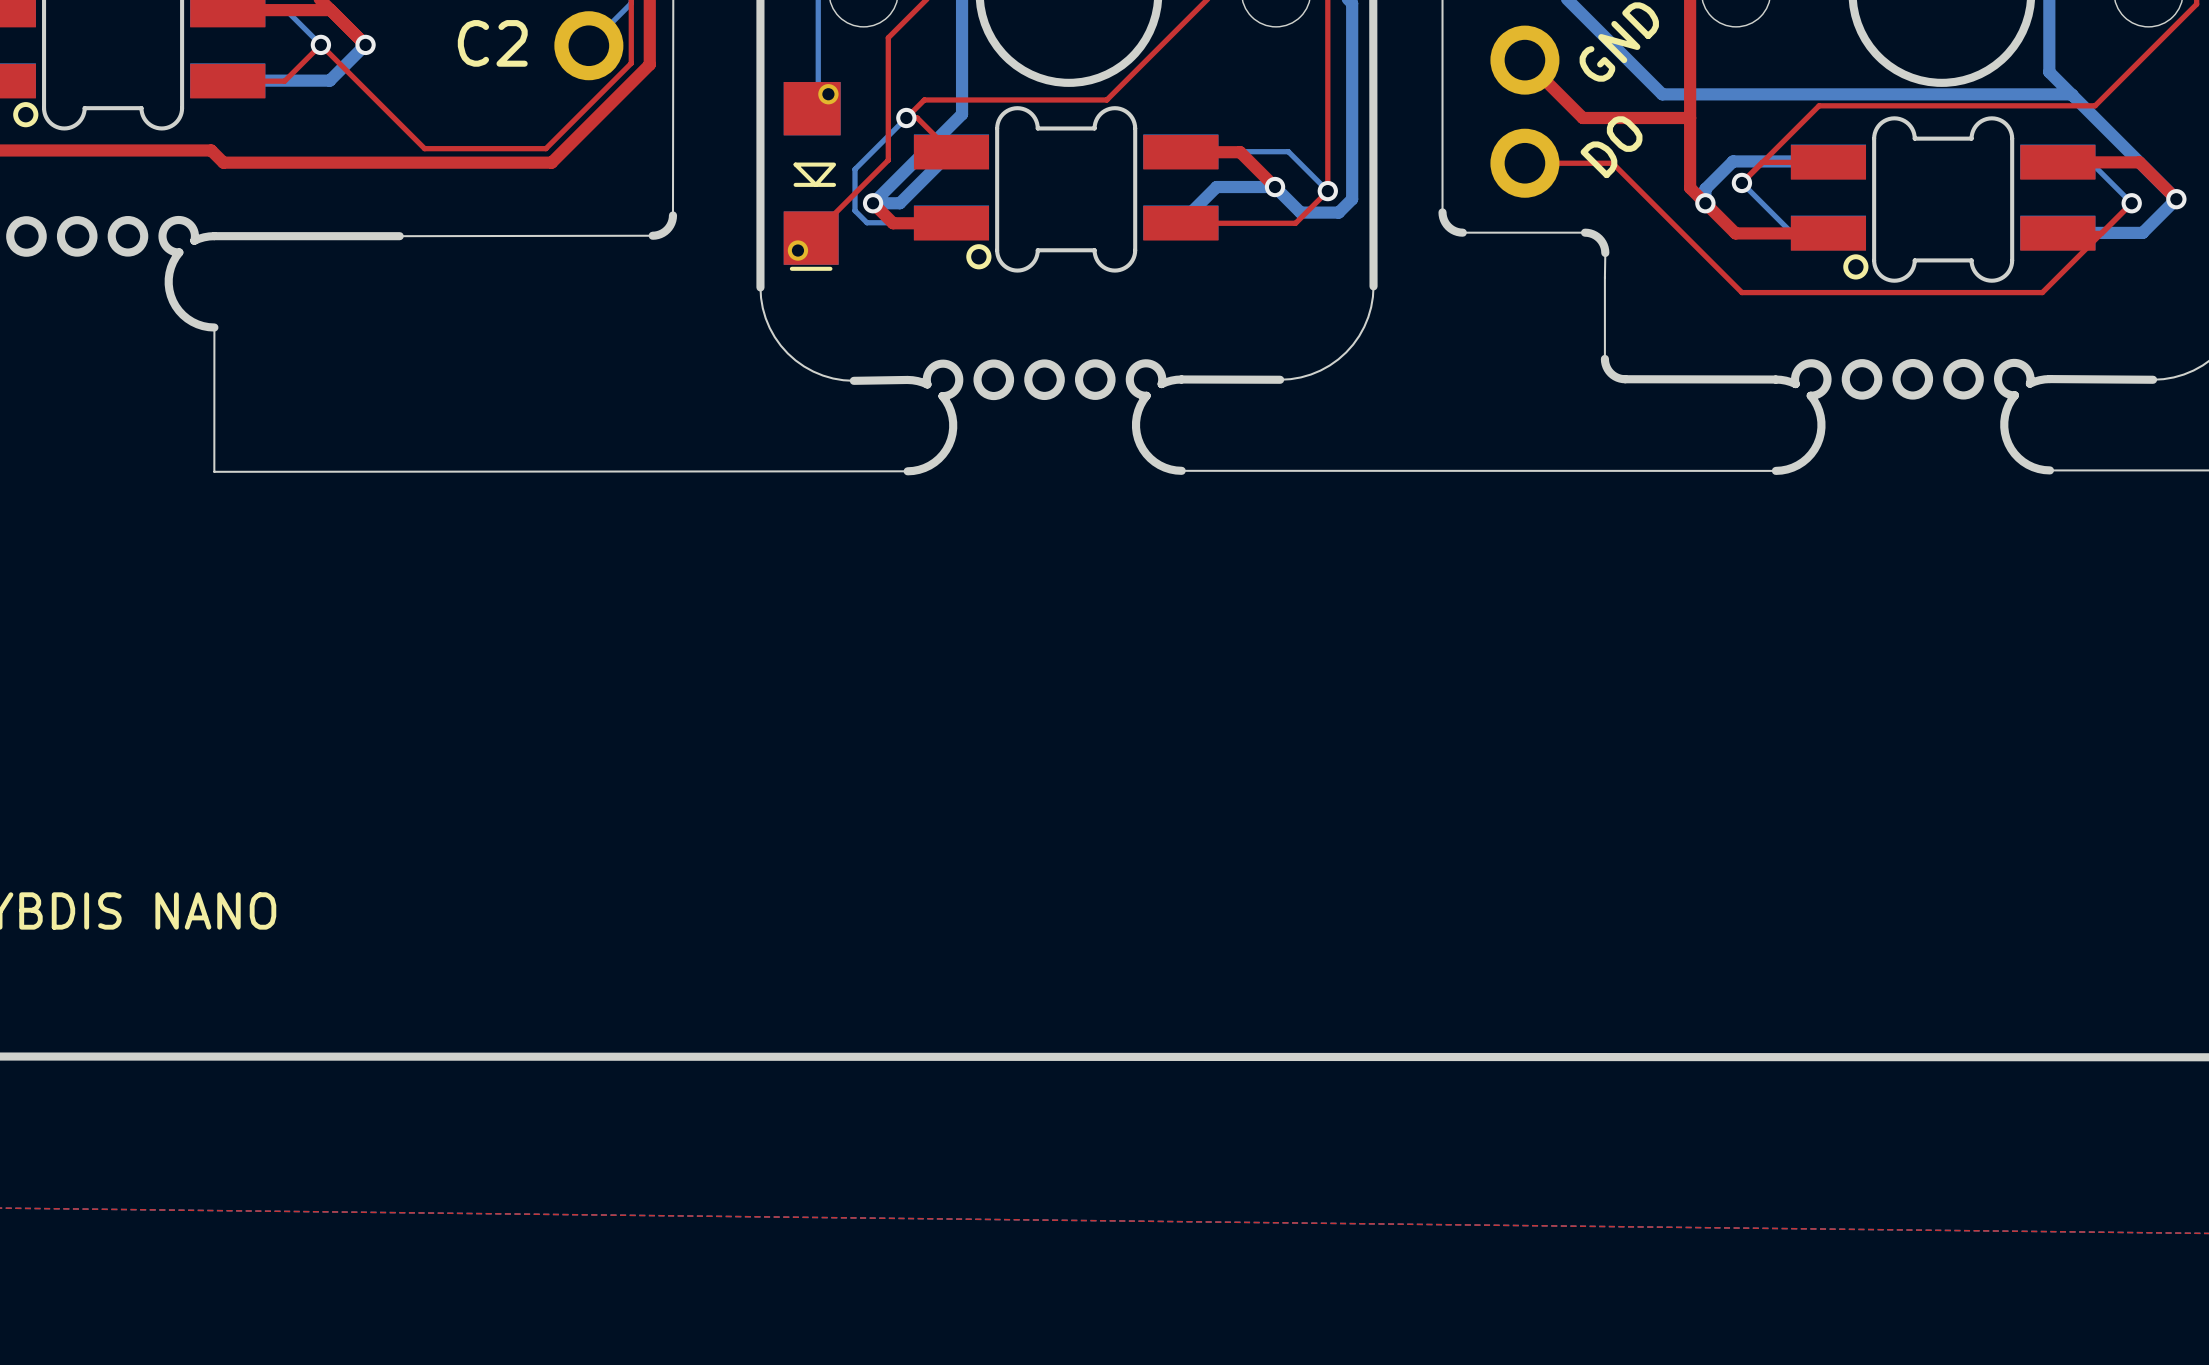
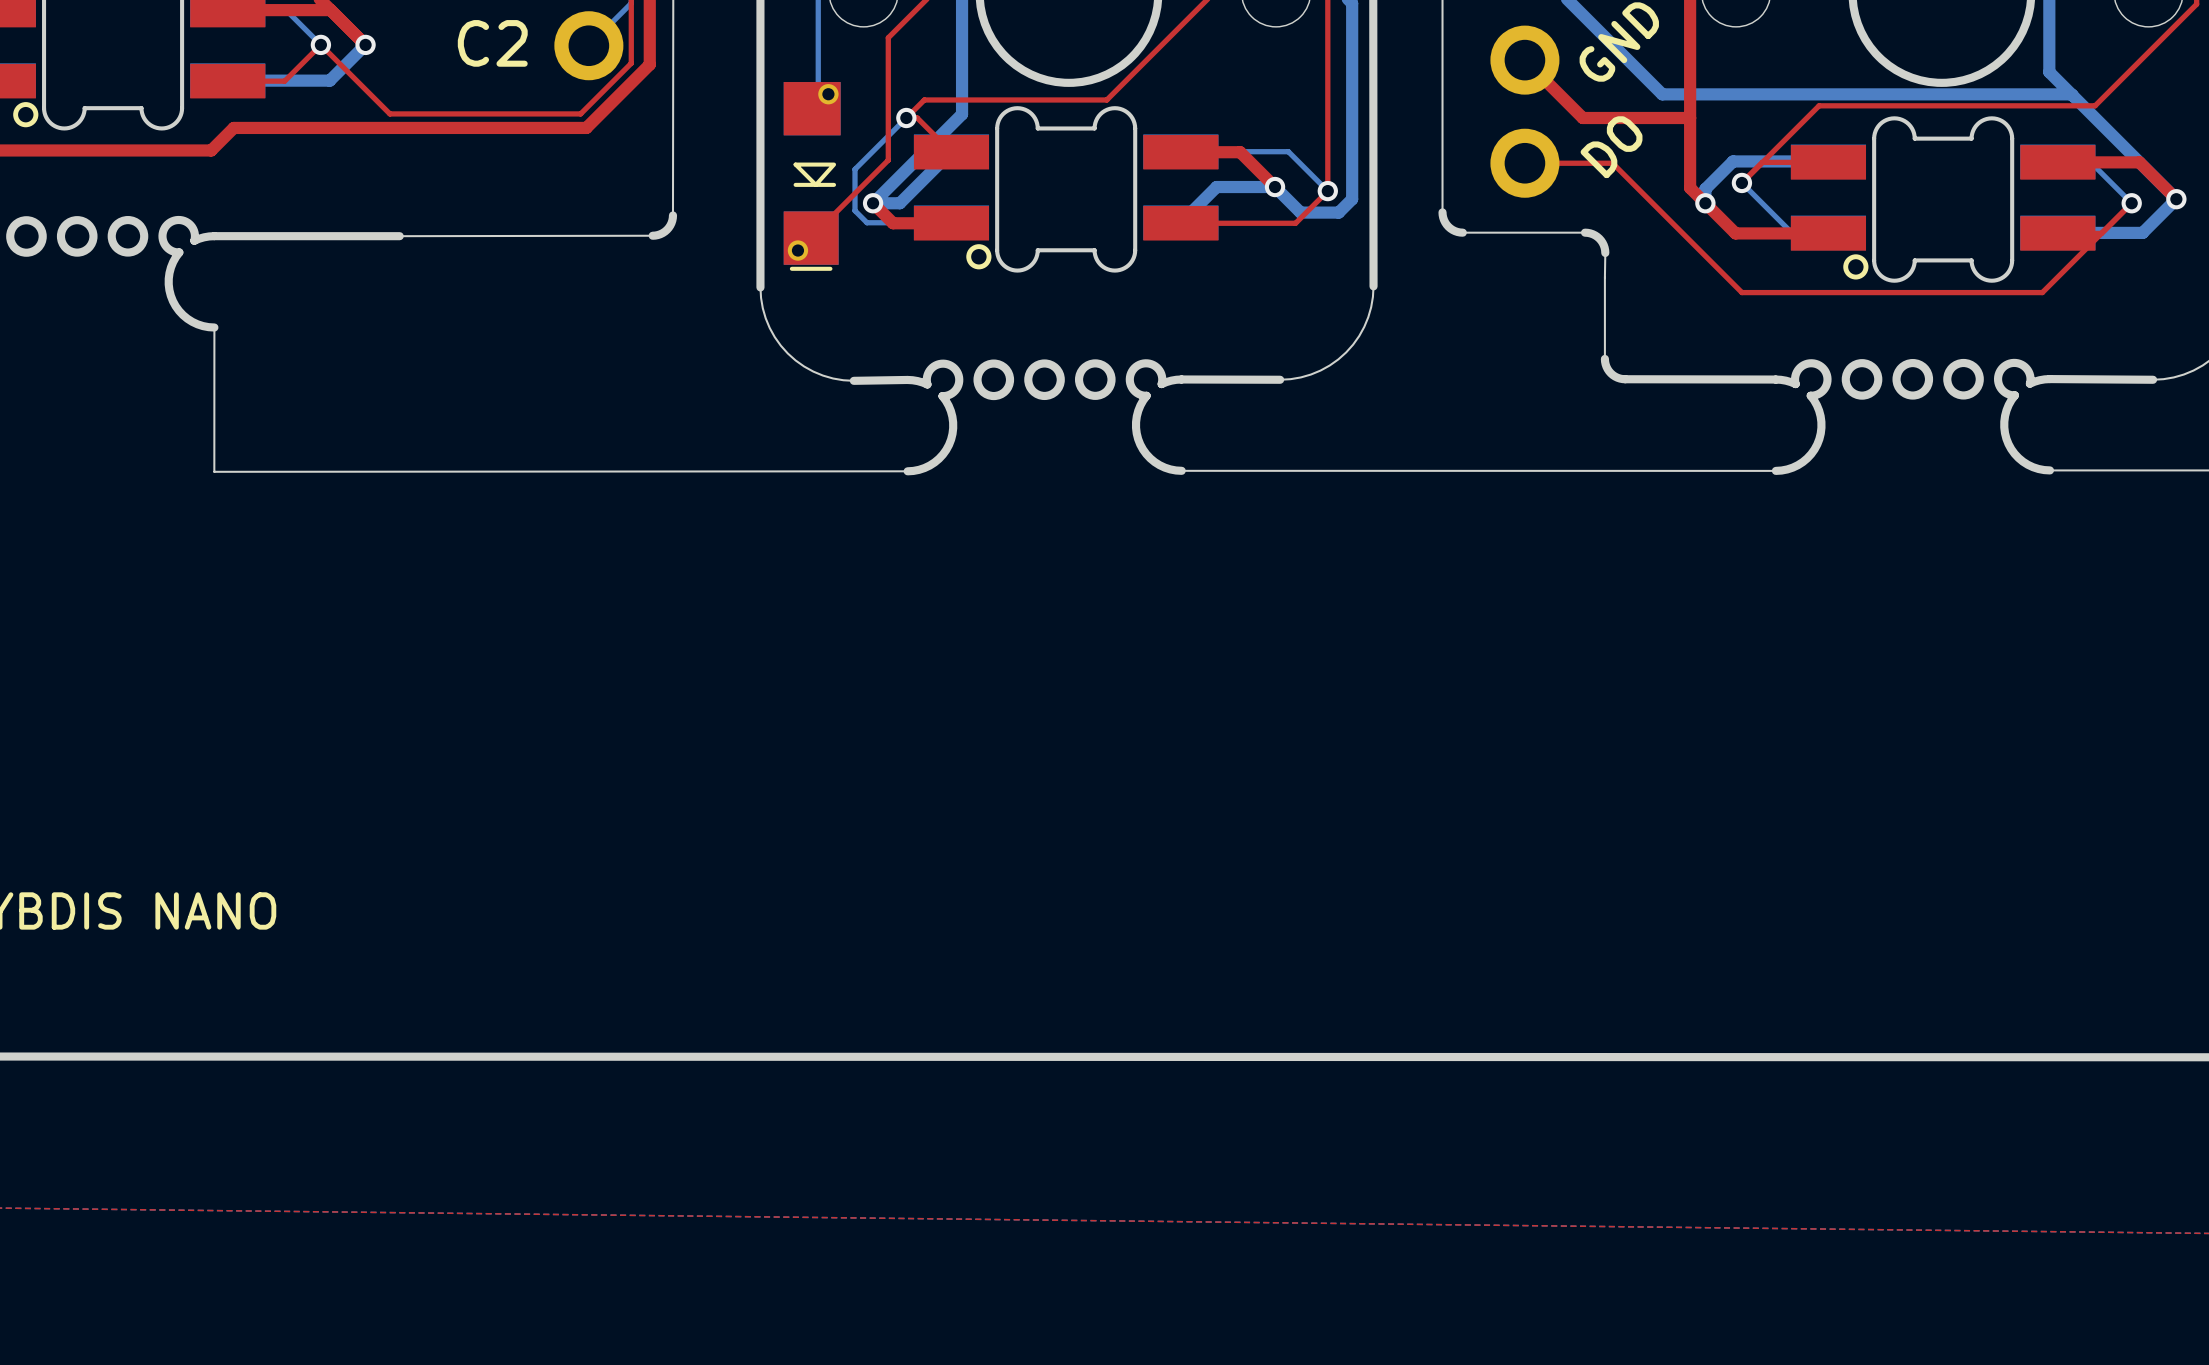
top track: (389, 113) (424, 148) (545, 148) (580, 113) -> (389, 113) (580, 113)
top track: (586, 127) (551, 162) (223, 162) (211, 150) -> (586, 127) (233, 127) (211, 150)

